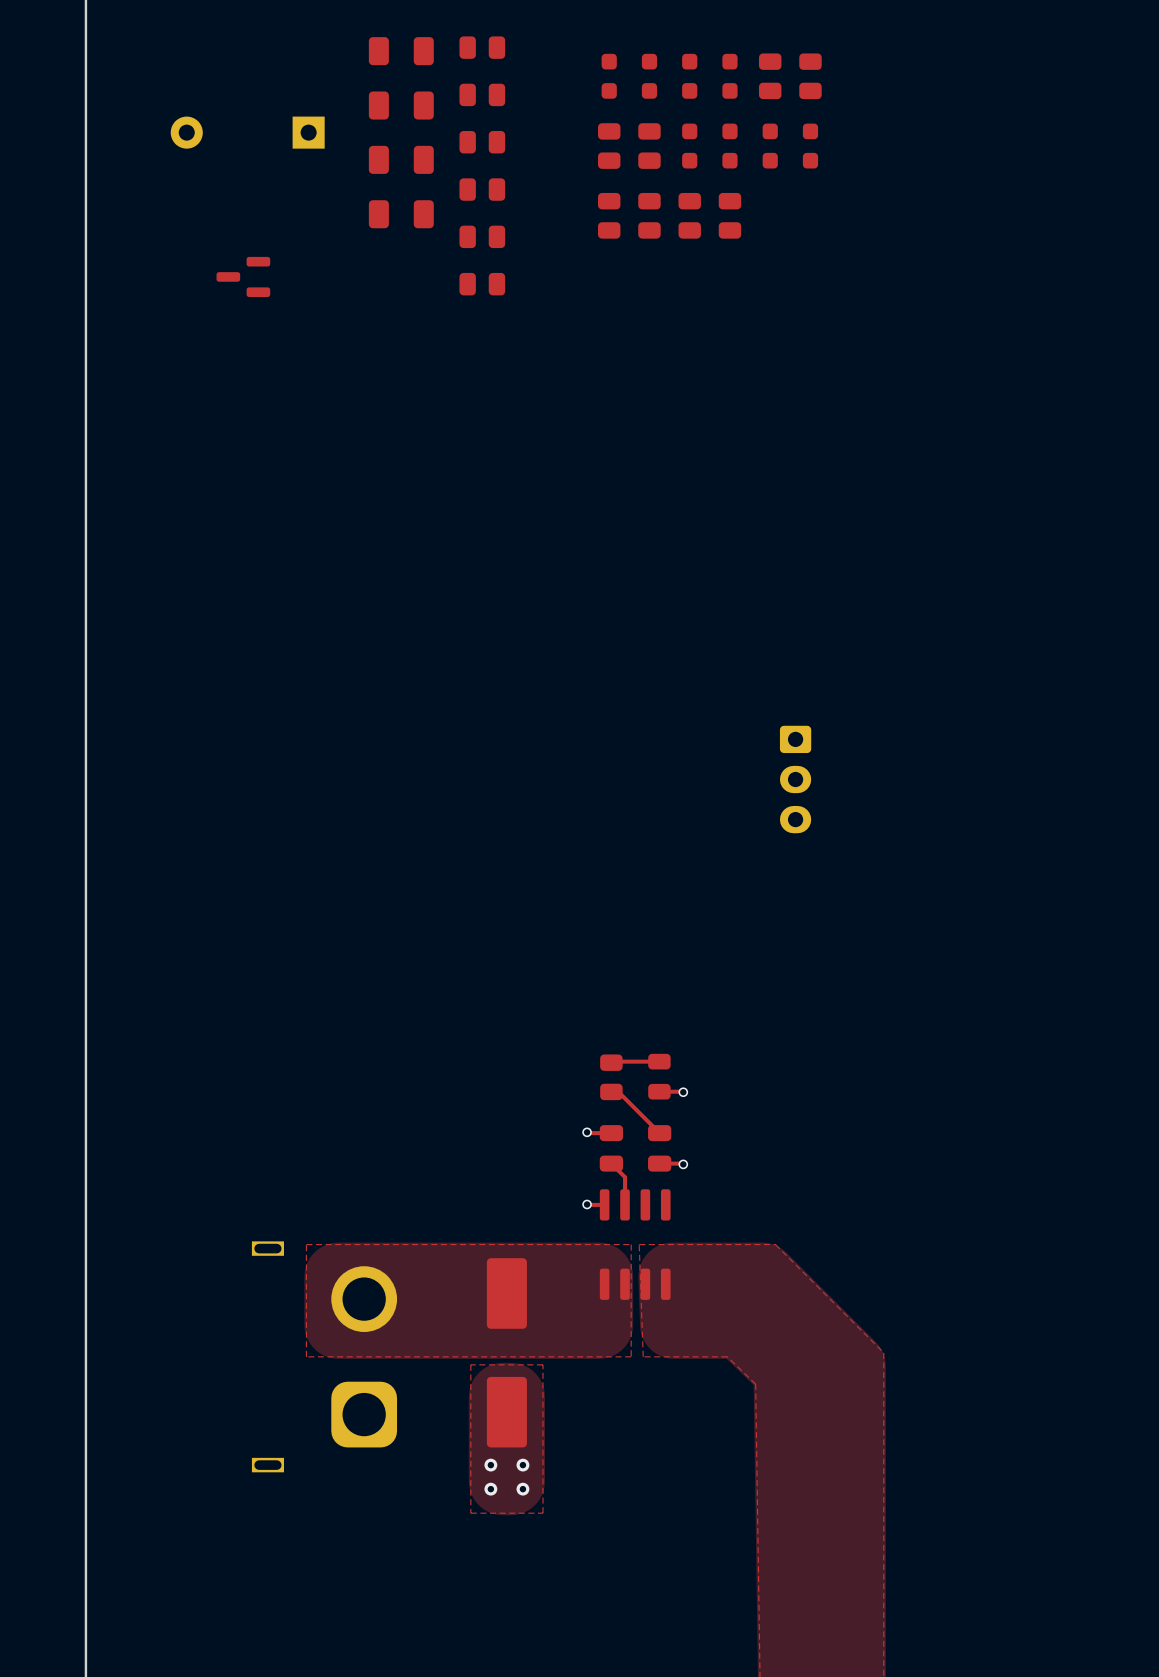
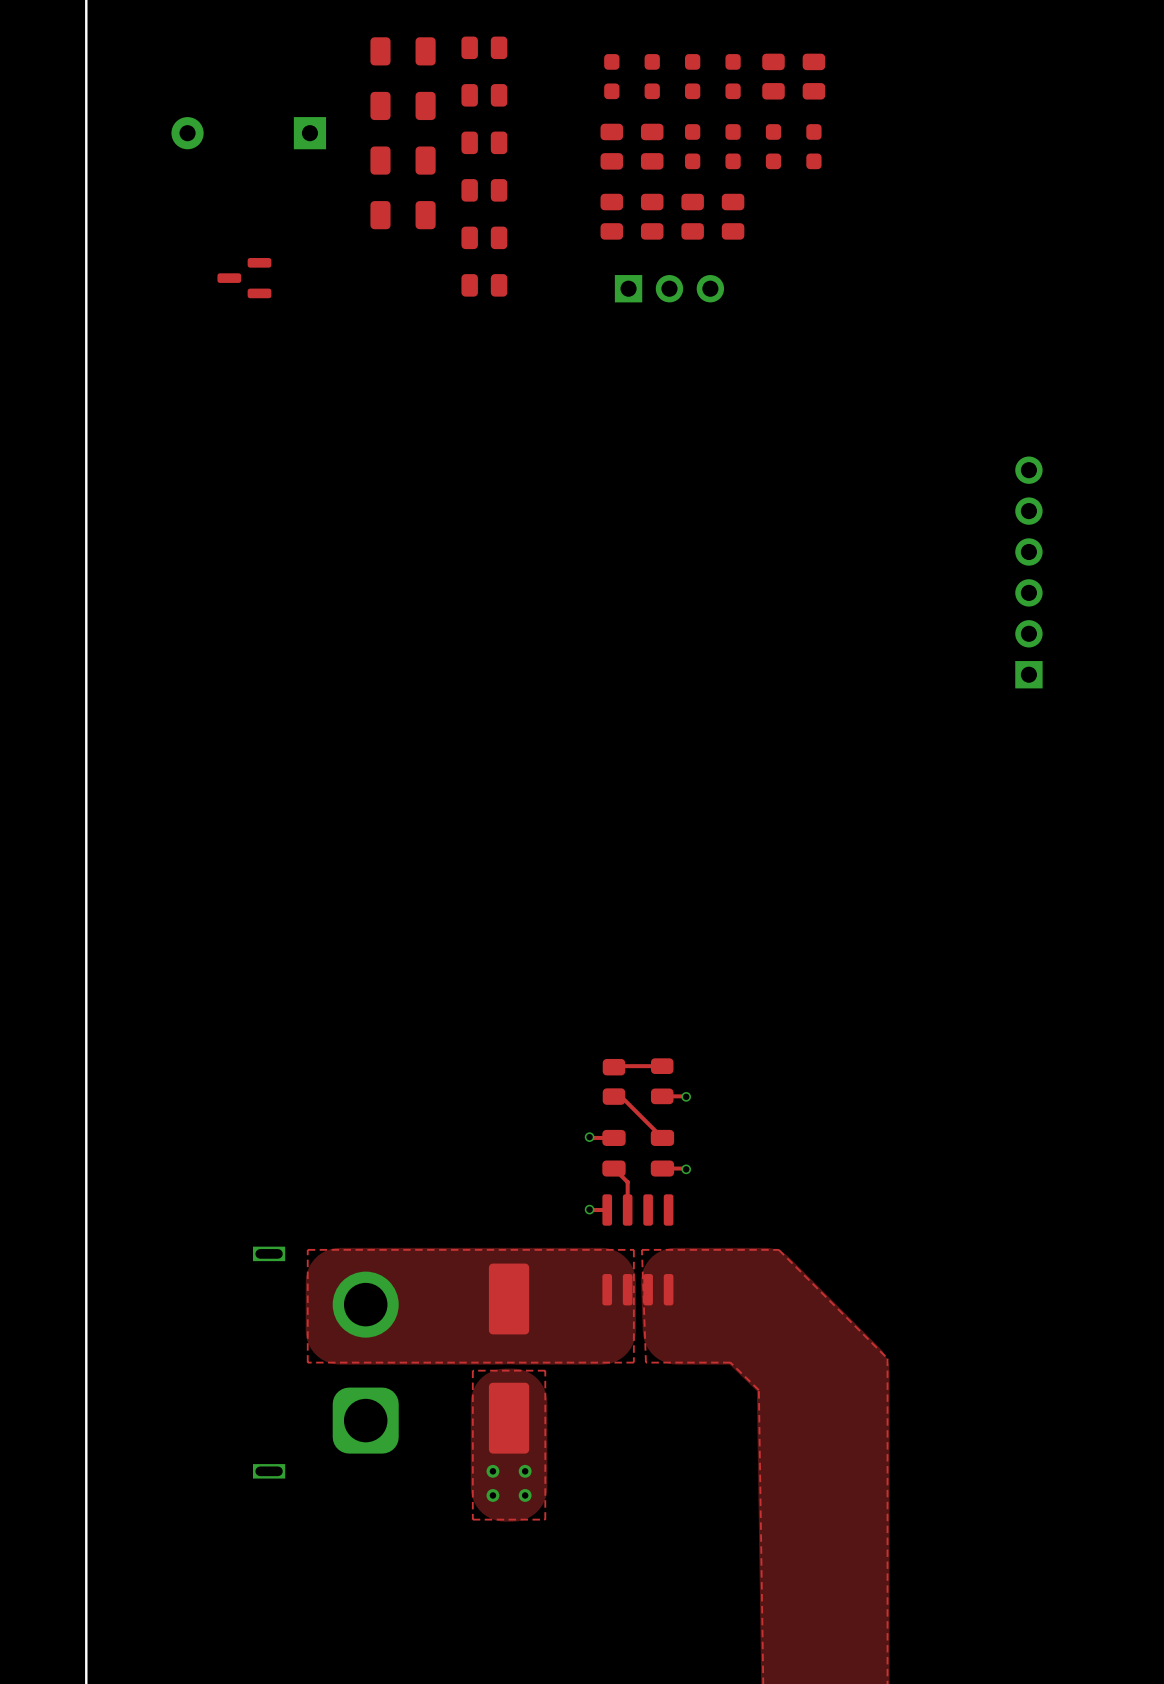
part: none -> (669, 288)
part: none -> (1028, 572)
part: (795, 779) -> none

